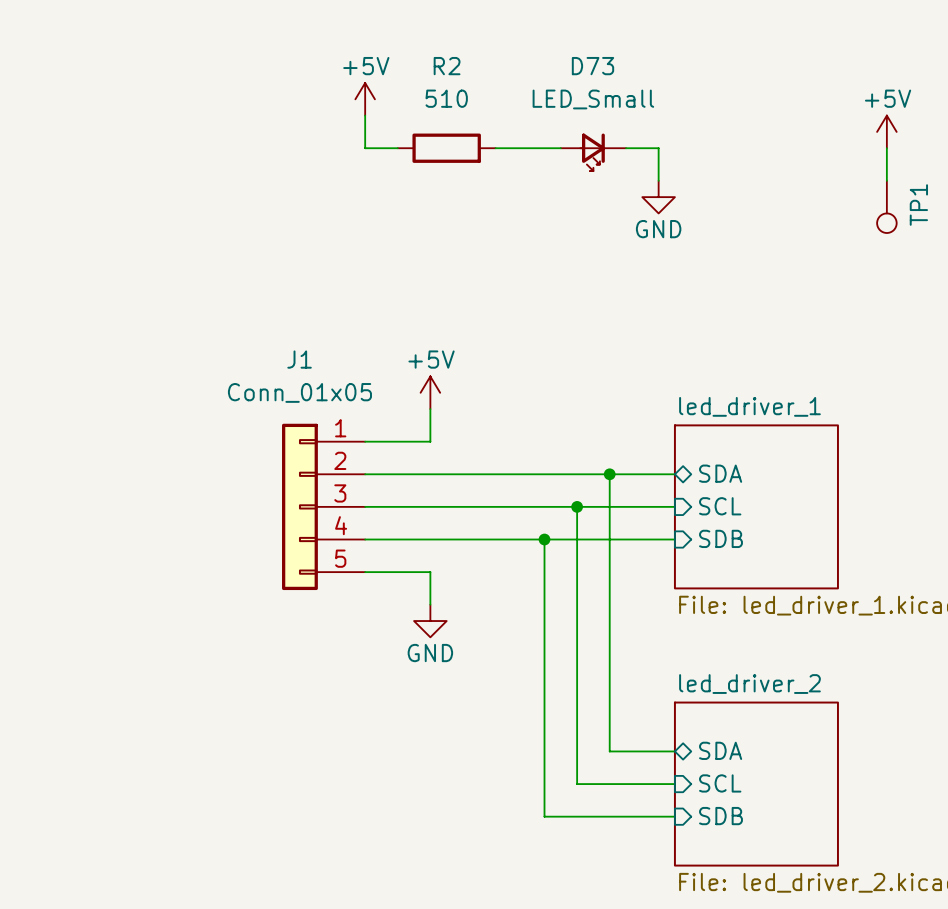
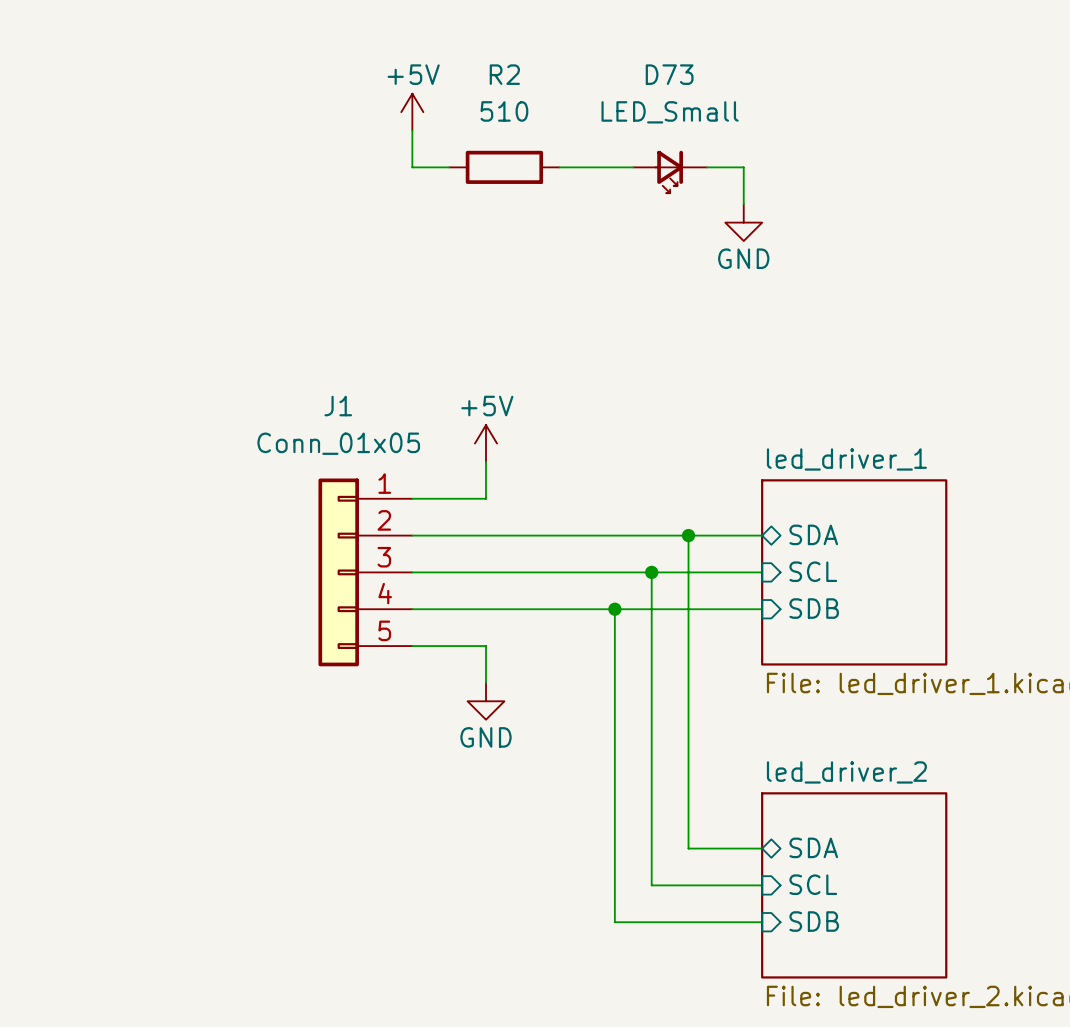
power symbol: +5V (886, 131) -> none
wire: (886, 148) (886, 180) -> none
TP1: (886, 206) -> none

